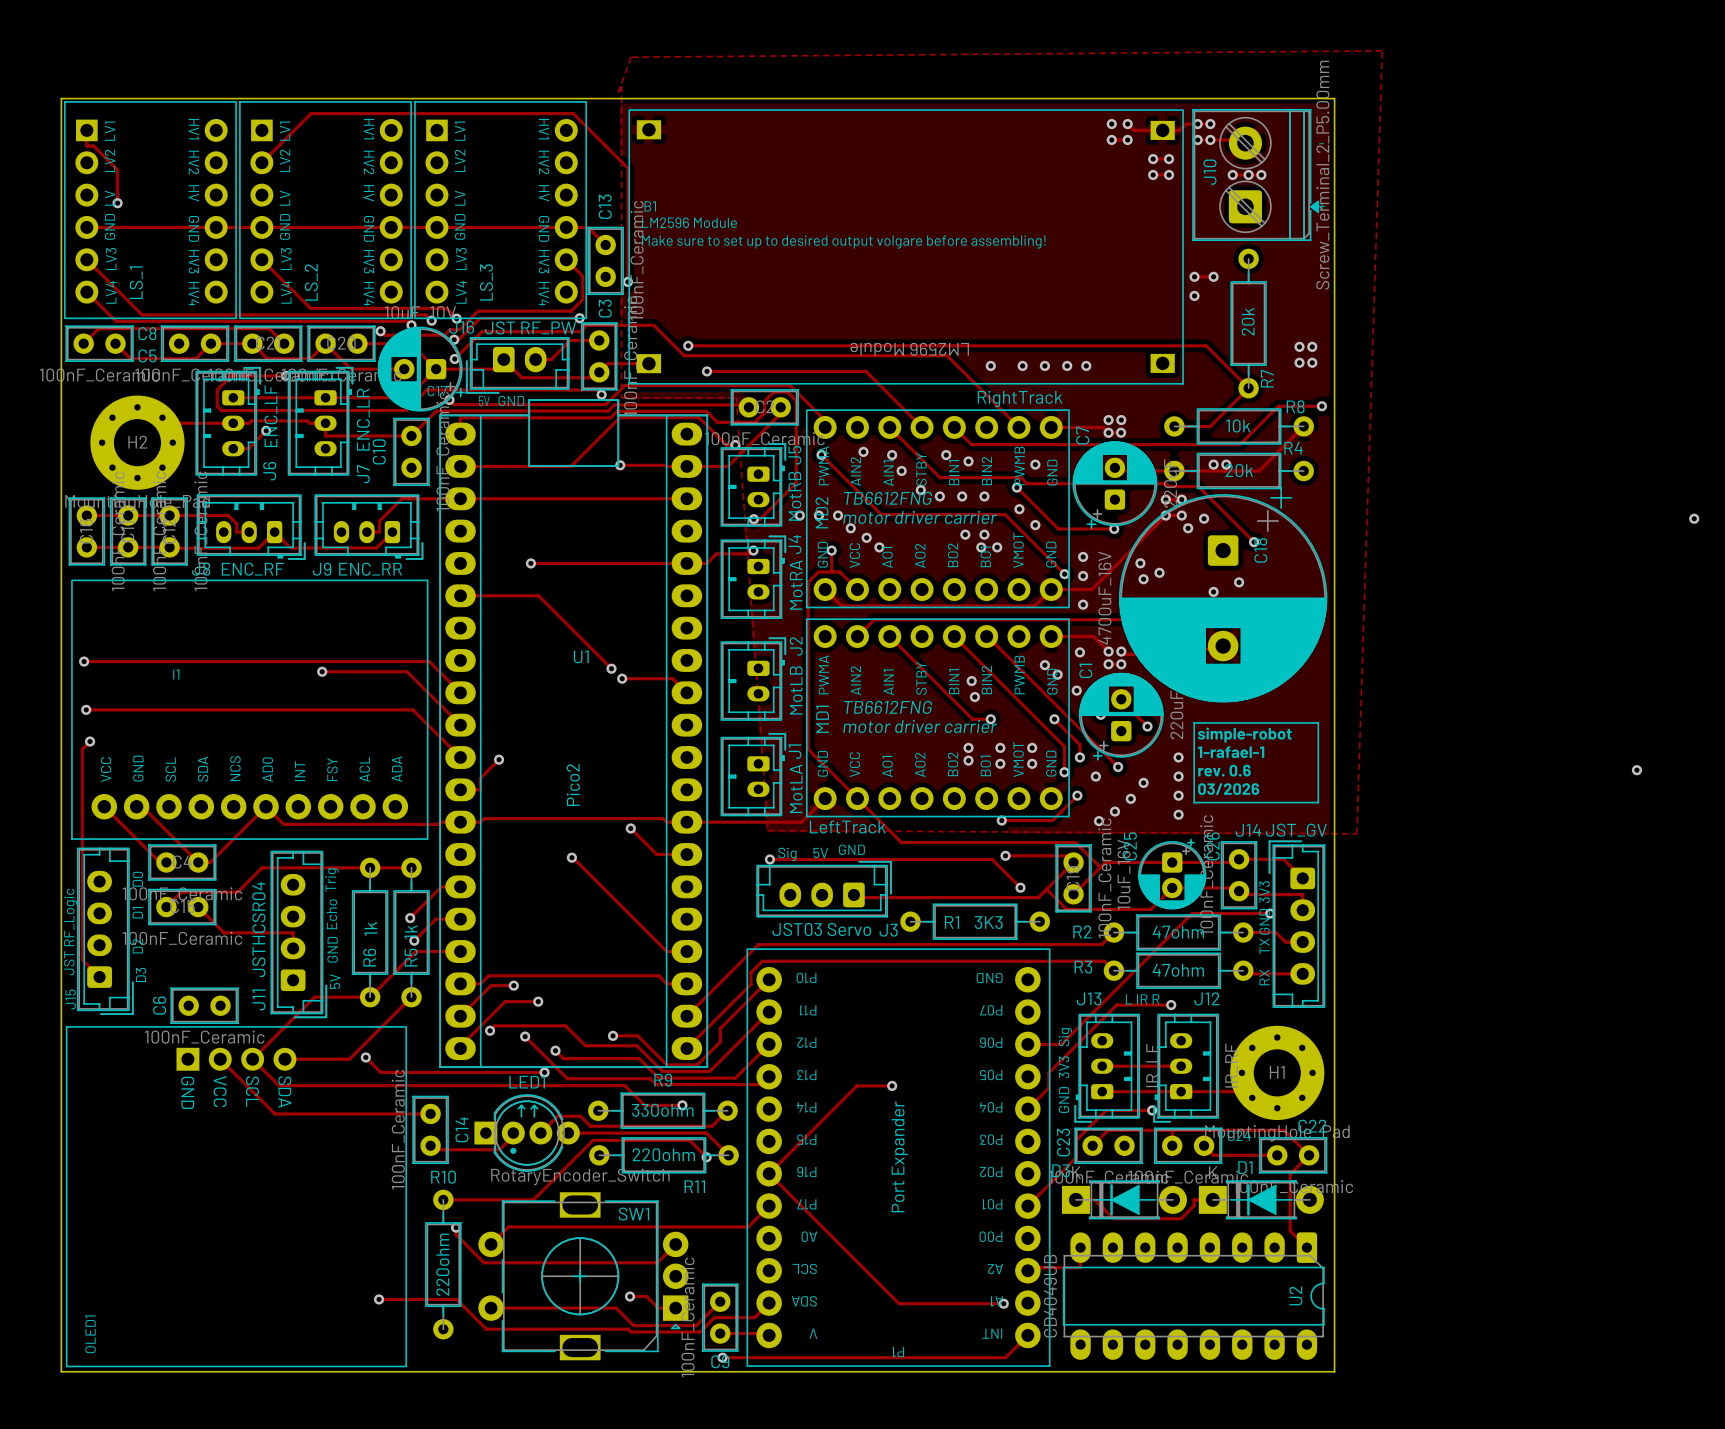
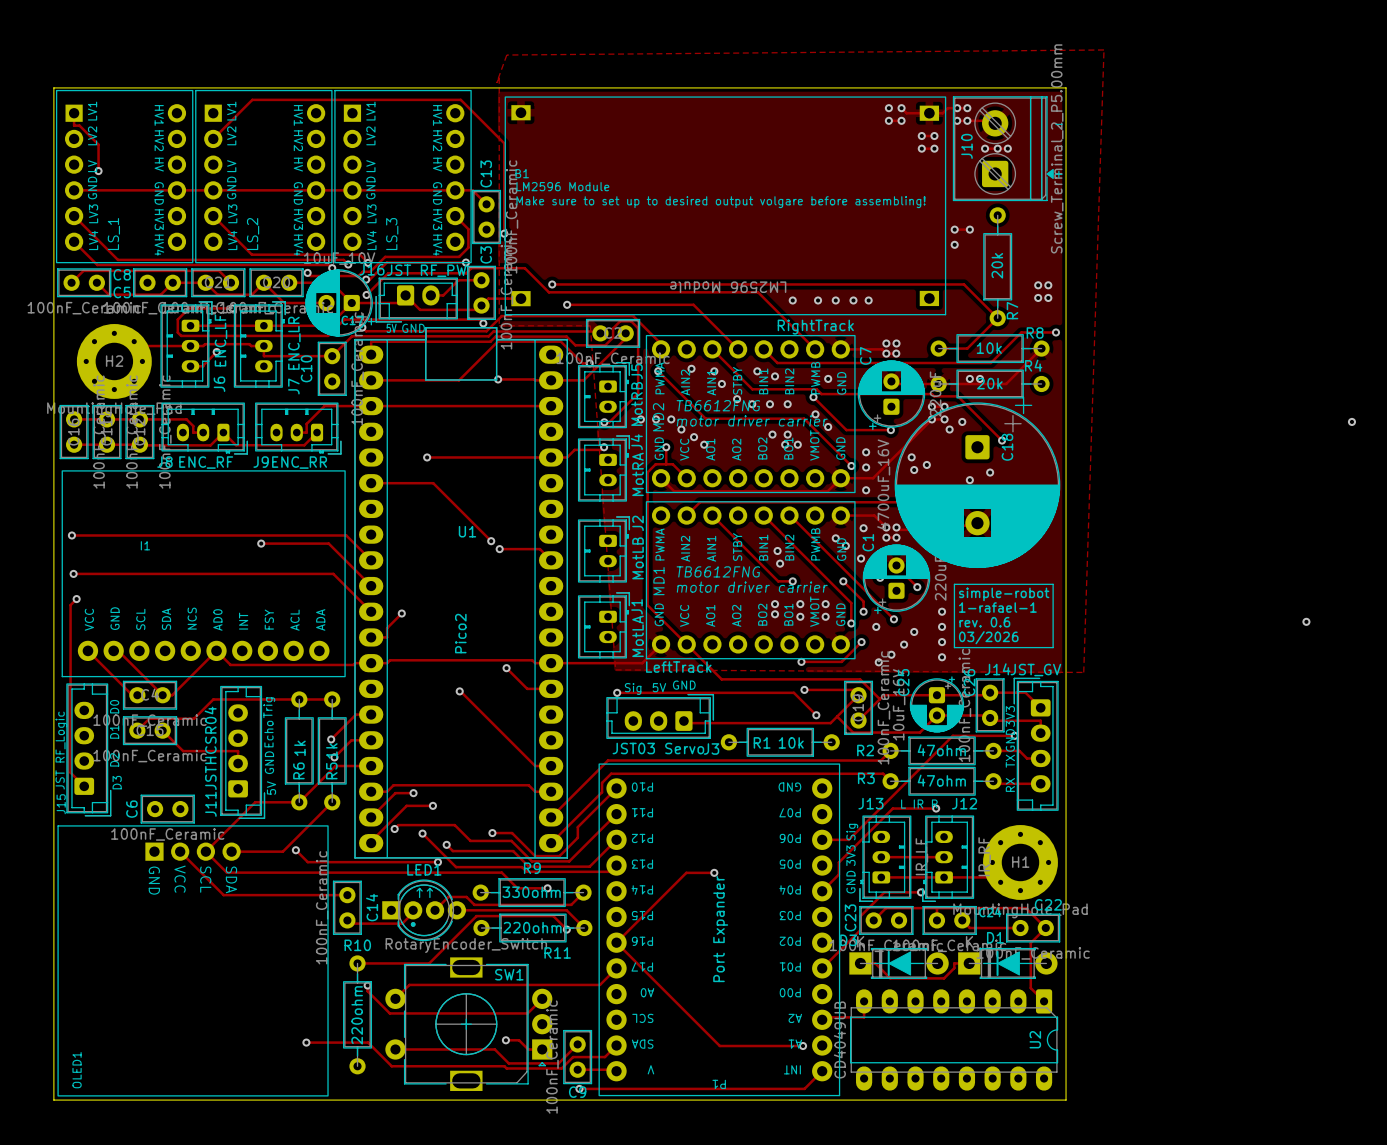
R1 value: 3K3 (988, 922) -> 10k (791, 742)

